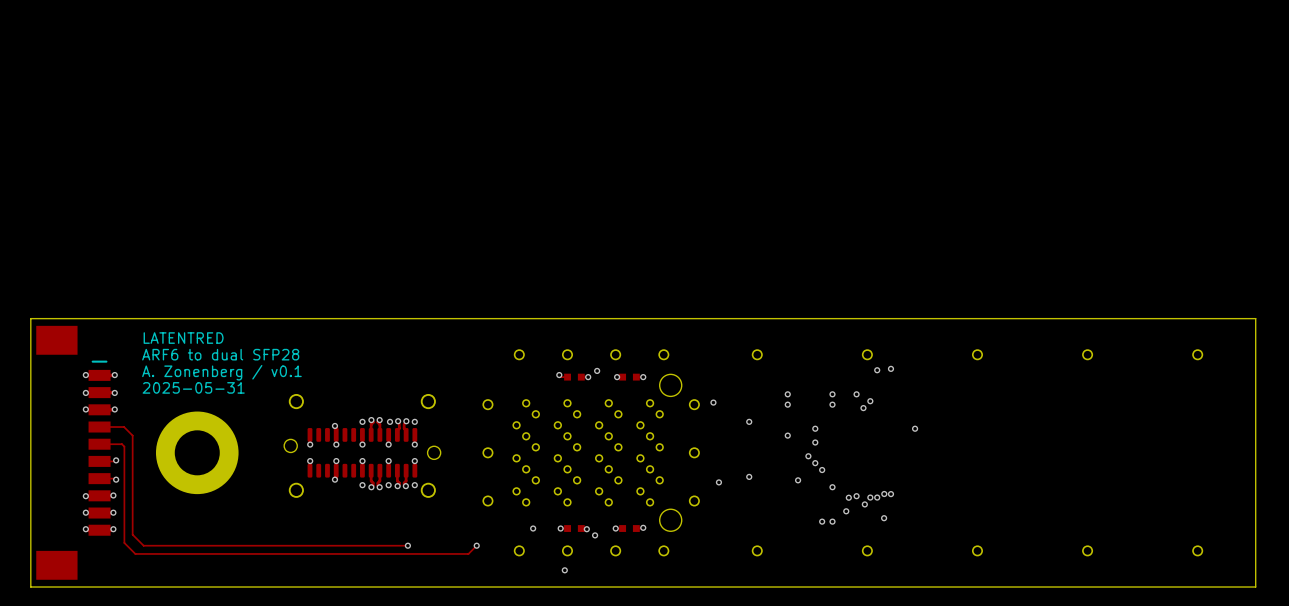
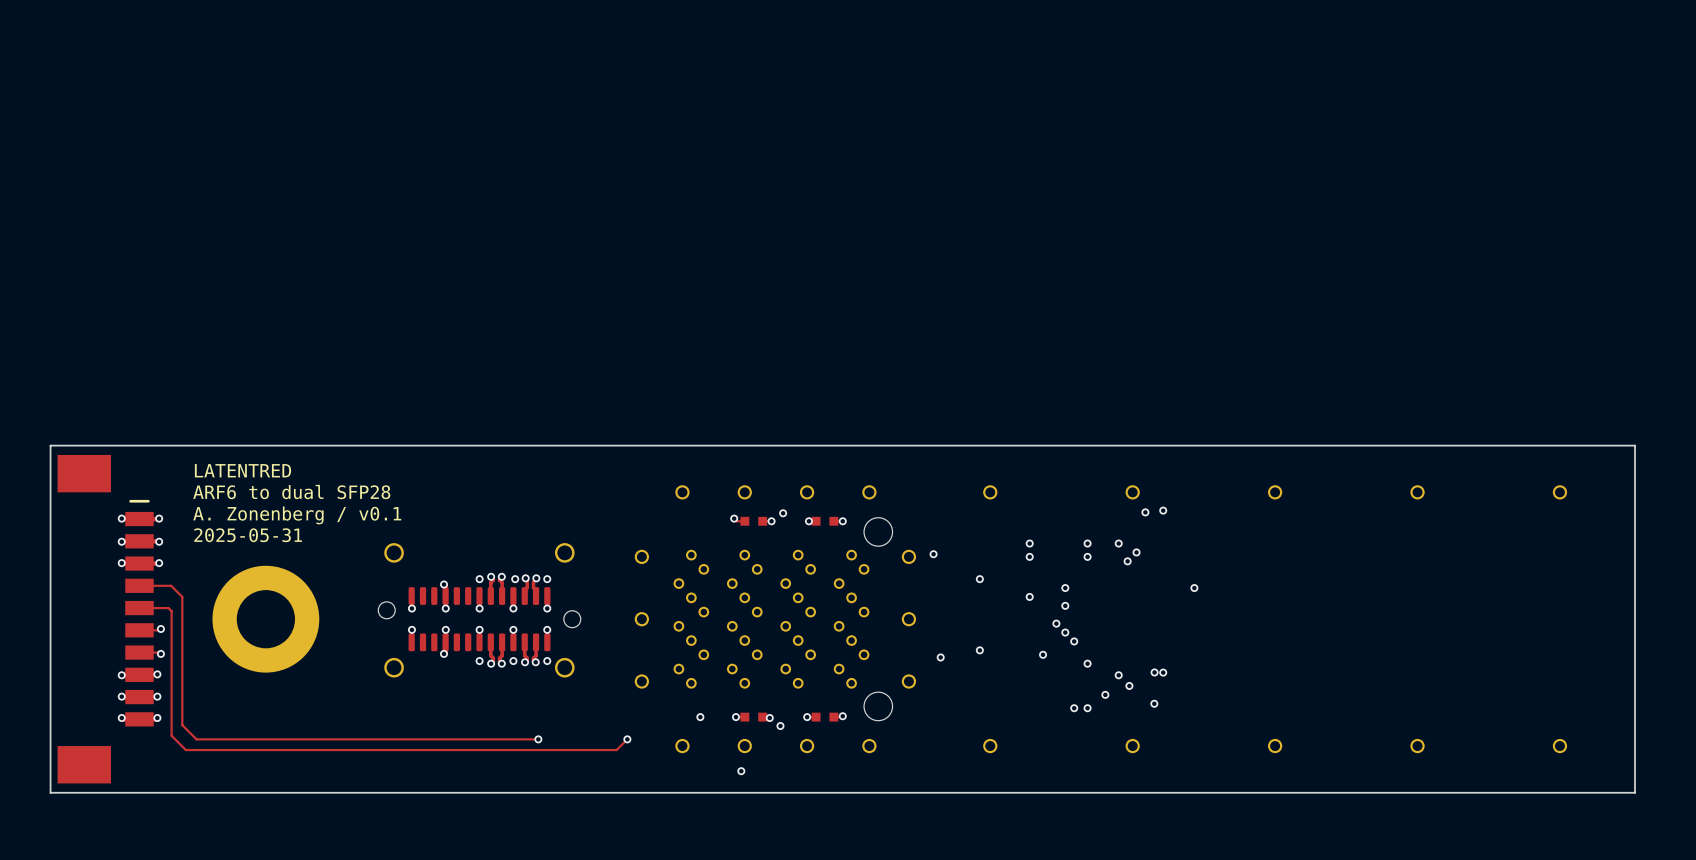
via: (848, 497) -> none
via: (870, 497) -> none
via: (877, 497) -> none

